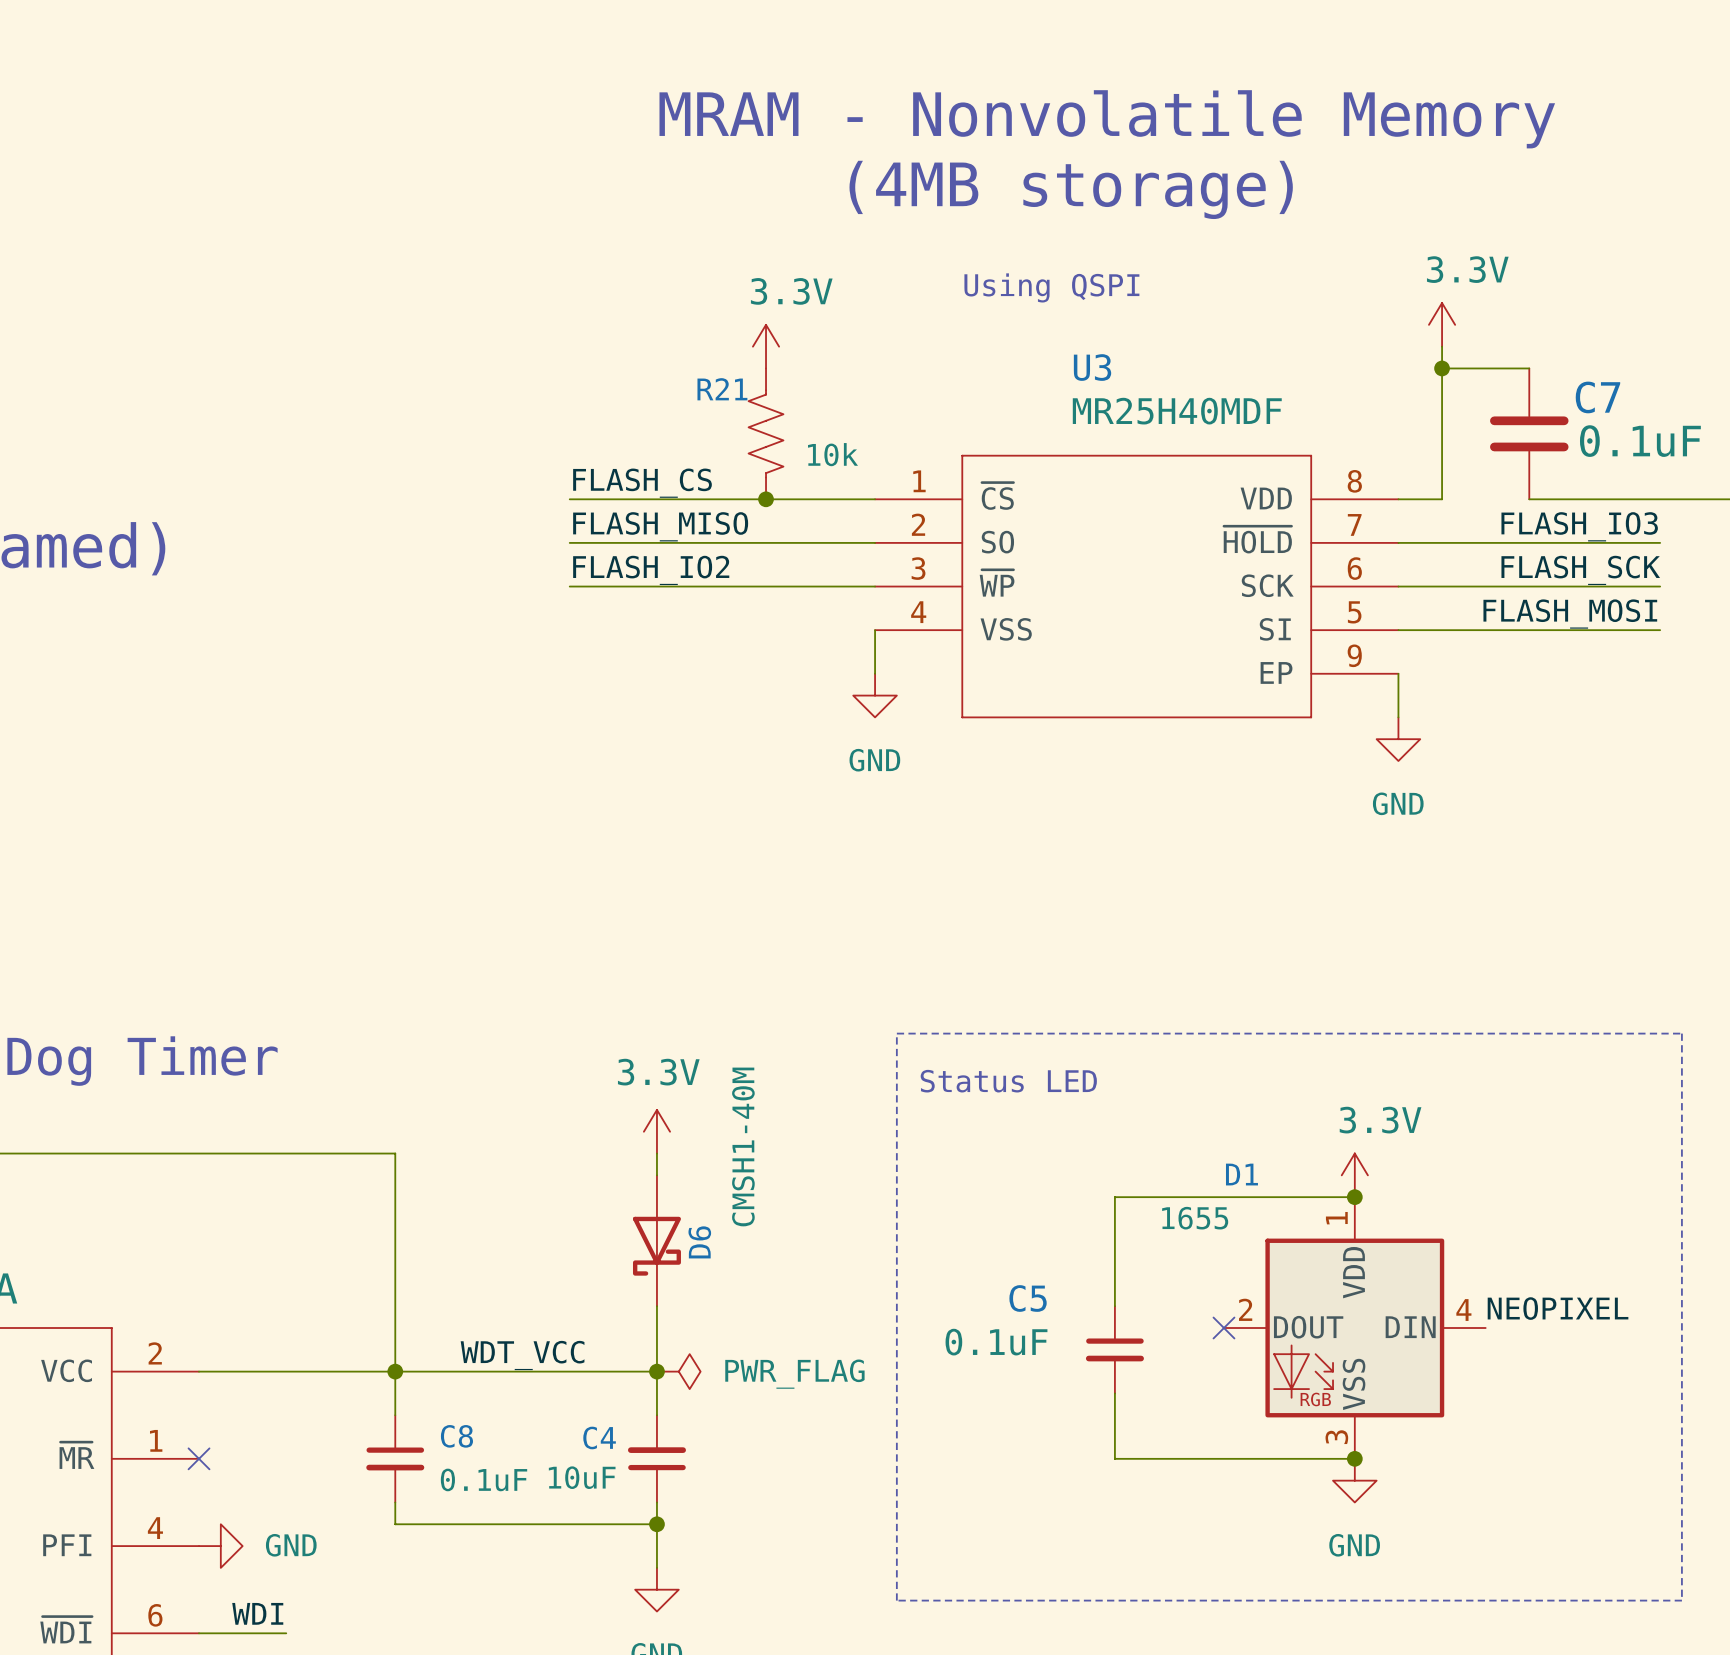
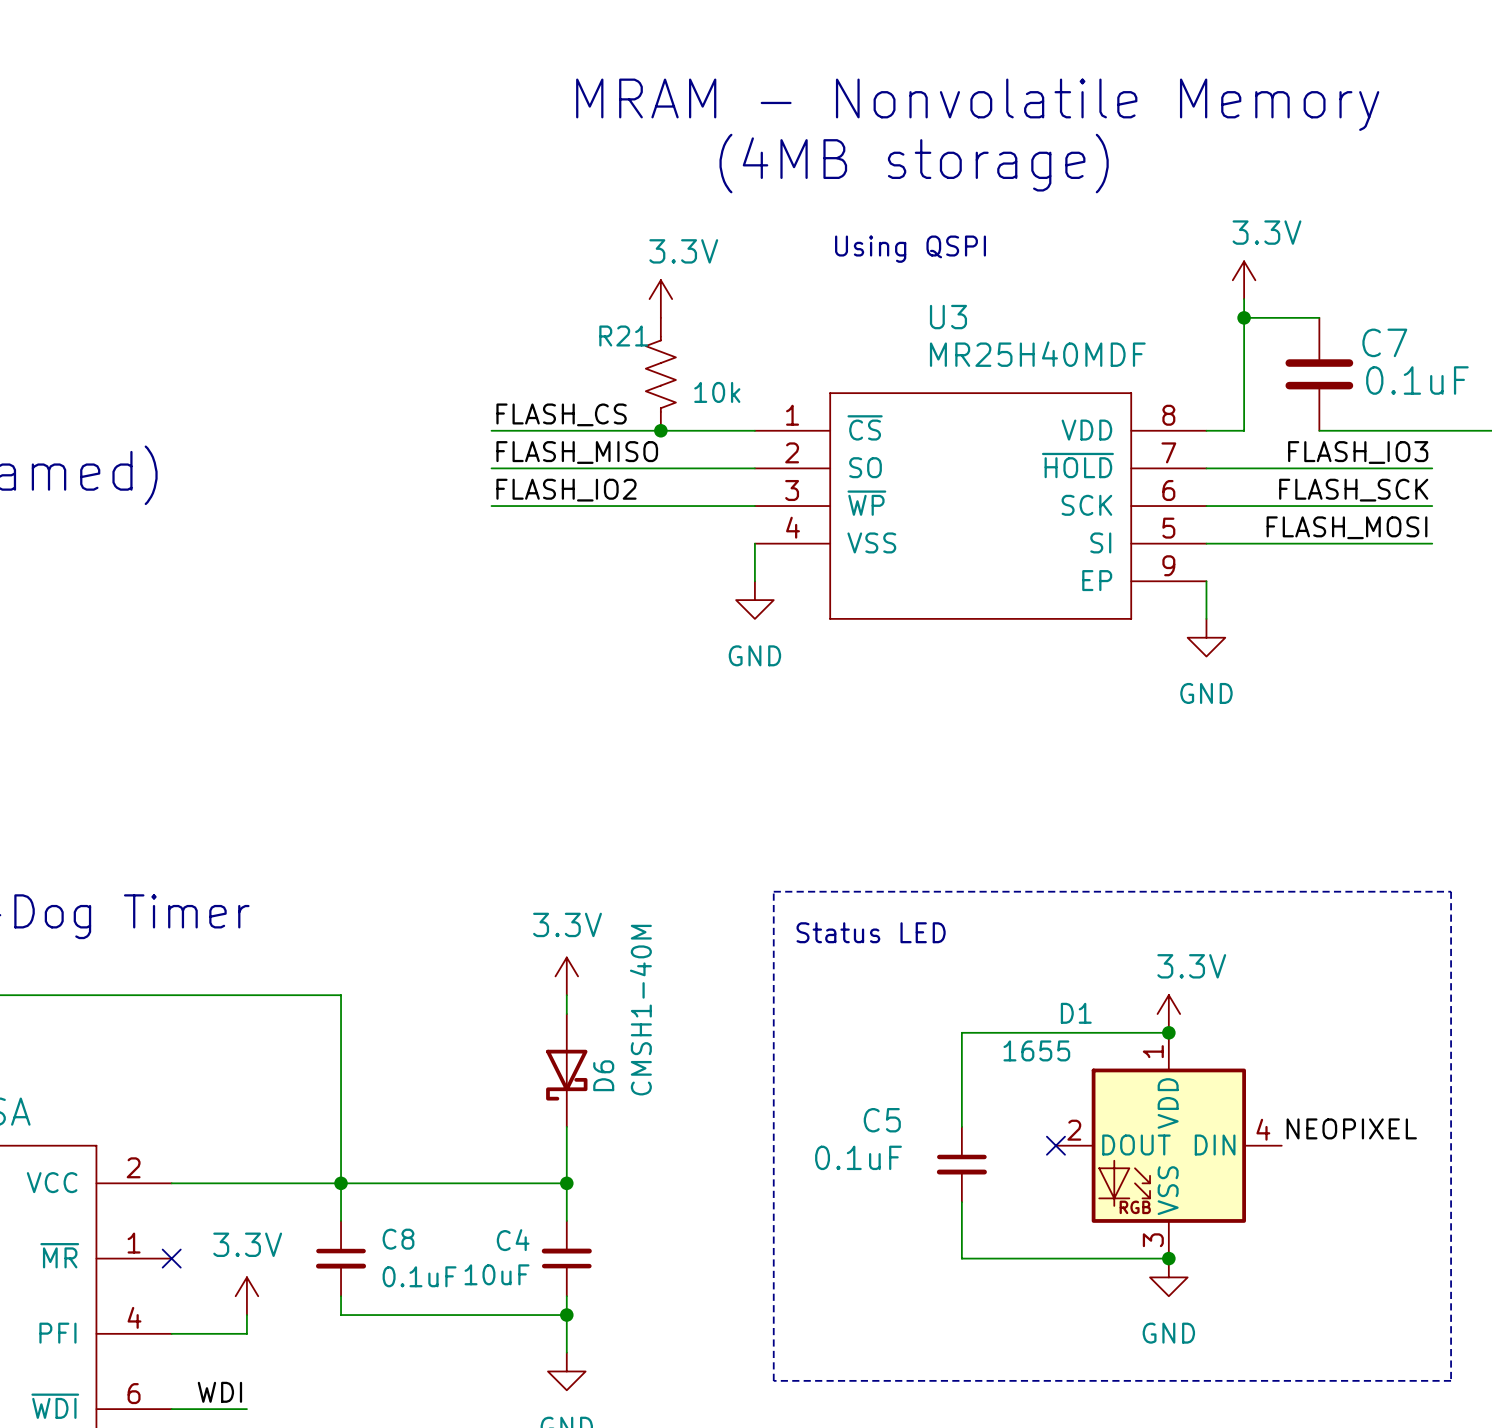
label: WDT_VCC (522, 1355) -> none
power symbol: PWR_FLAG (678, 1371) -> none
power symbol: none -> 3.3V (246, 1296)
wire: none -> (246, 1315) (246, 1333) (171, 1333)
power symbol: GND (220, 1546) -> none

